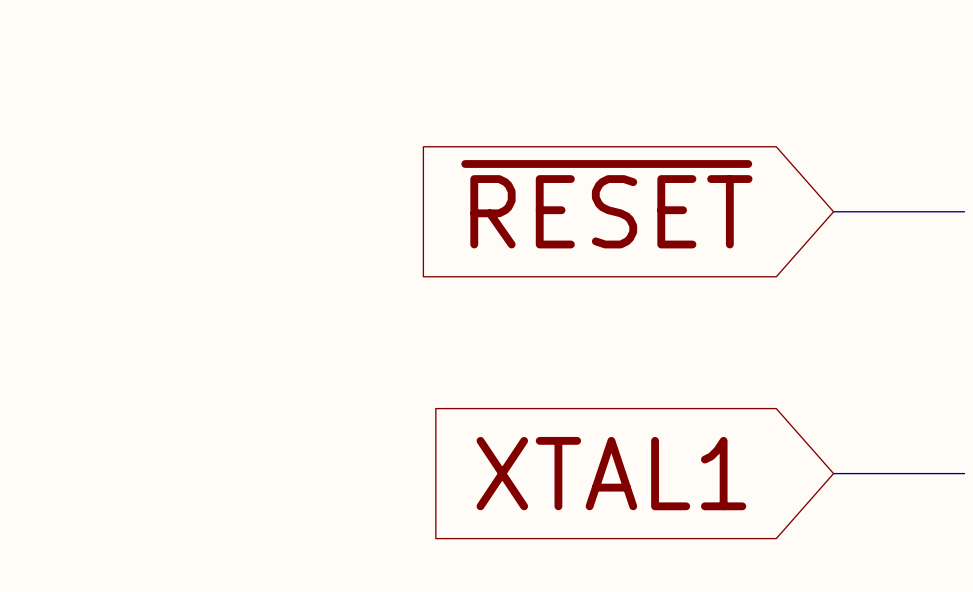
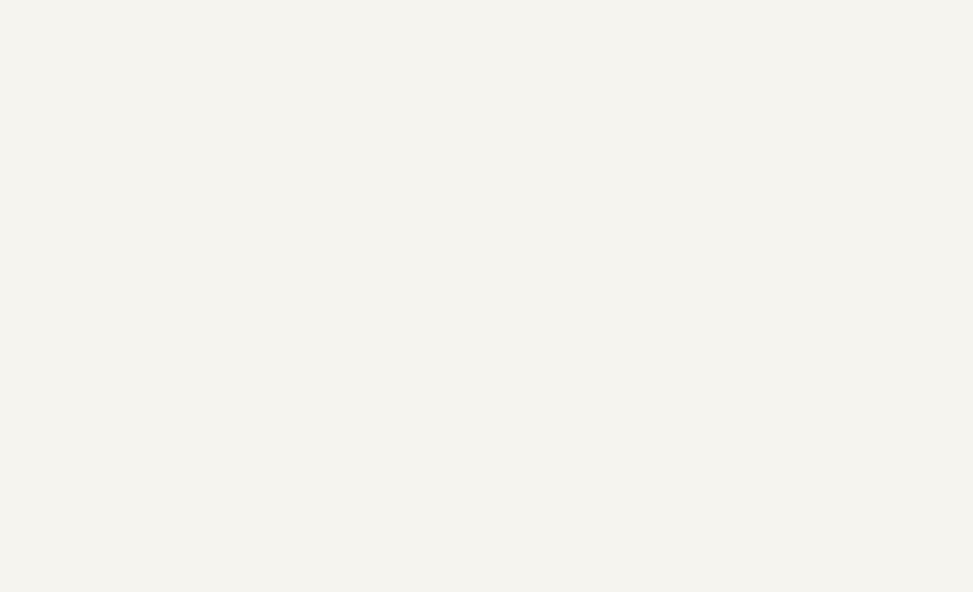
global label: ~{RESET} (606, 204) -> none
wire: (833, 211) (964, 211) -> none
global label: XTAL1 (611, 473) -> none
wire: (833, 473) (964, 473) -> none

